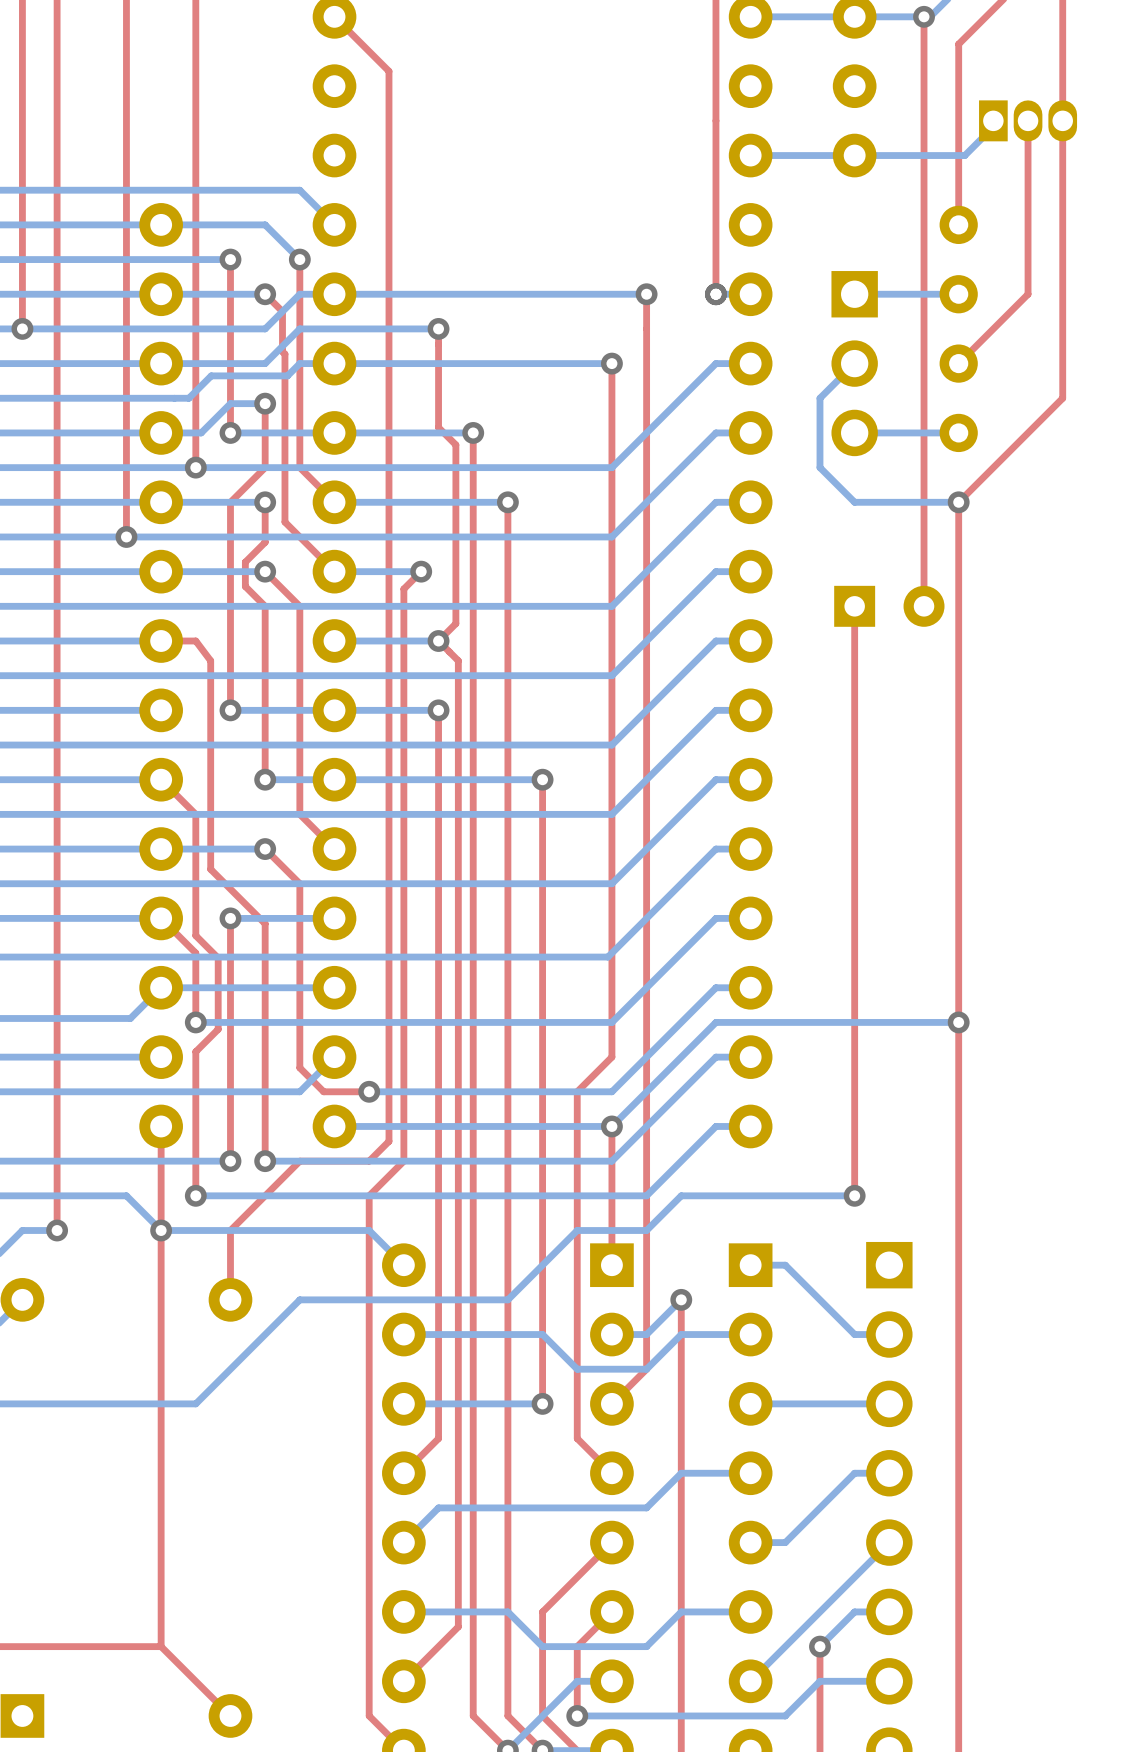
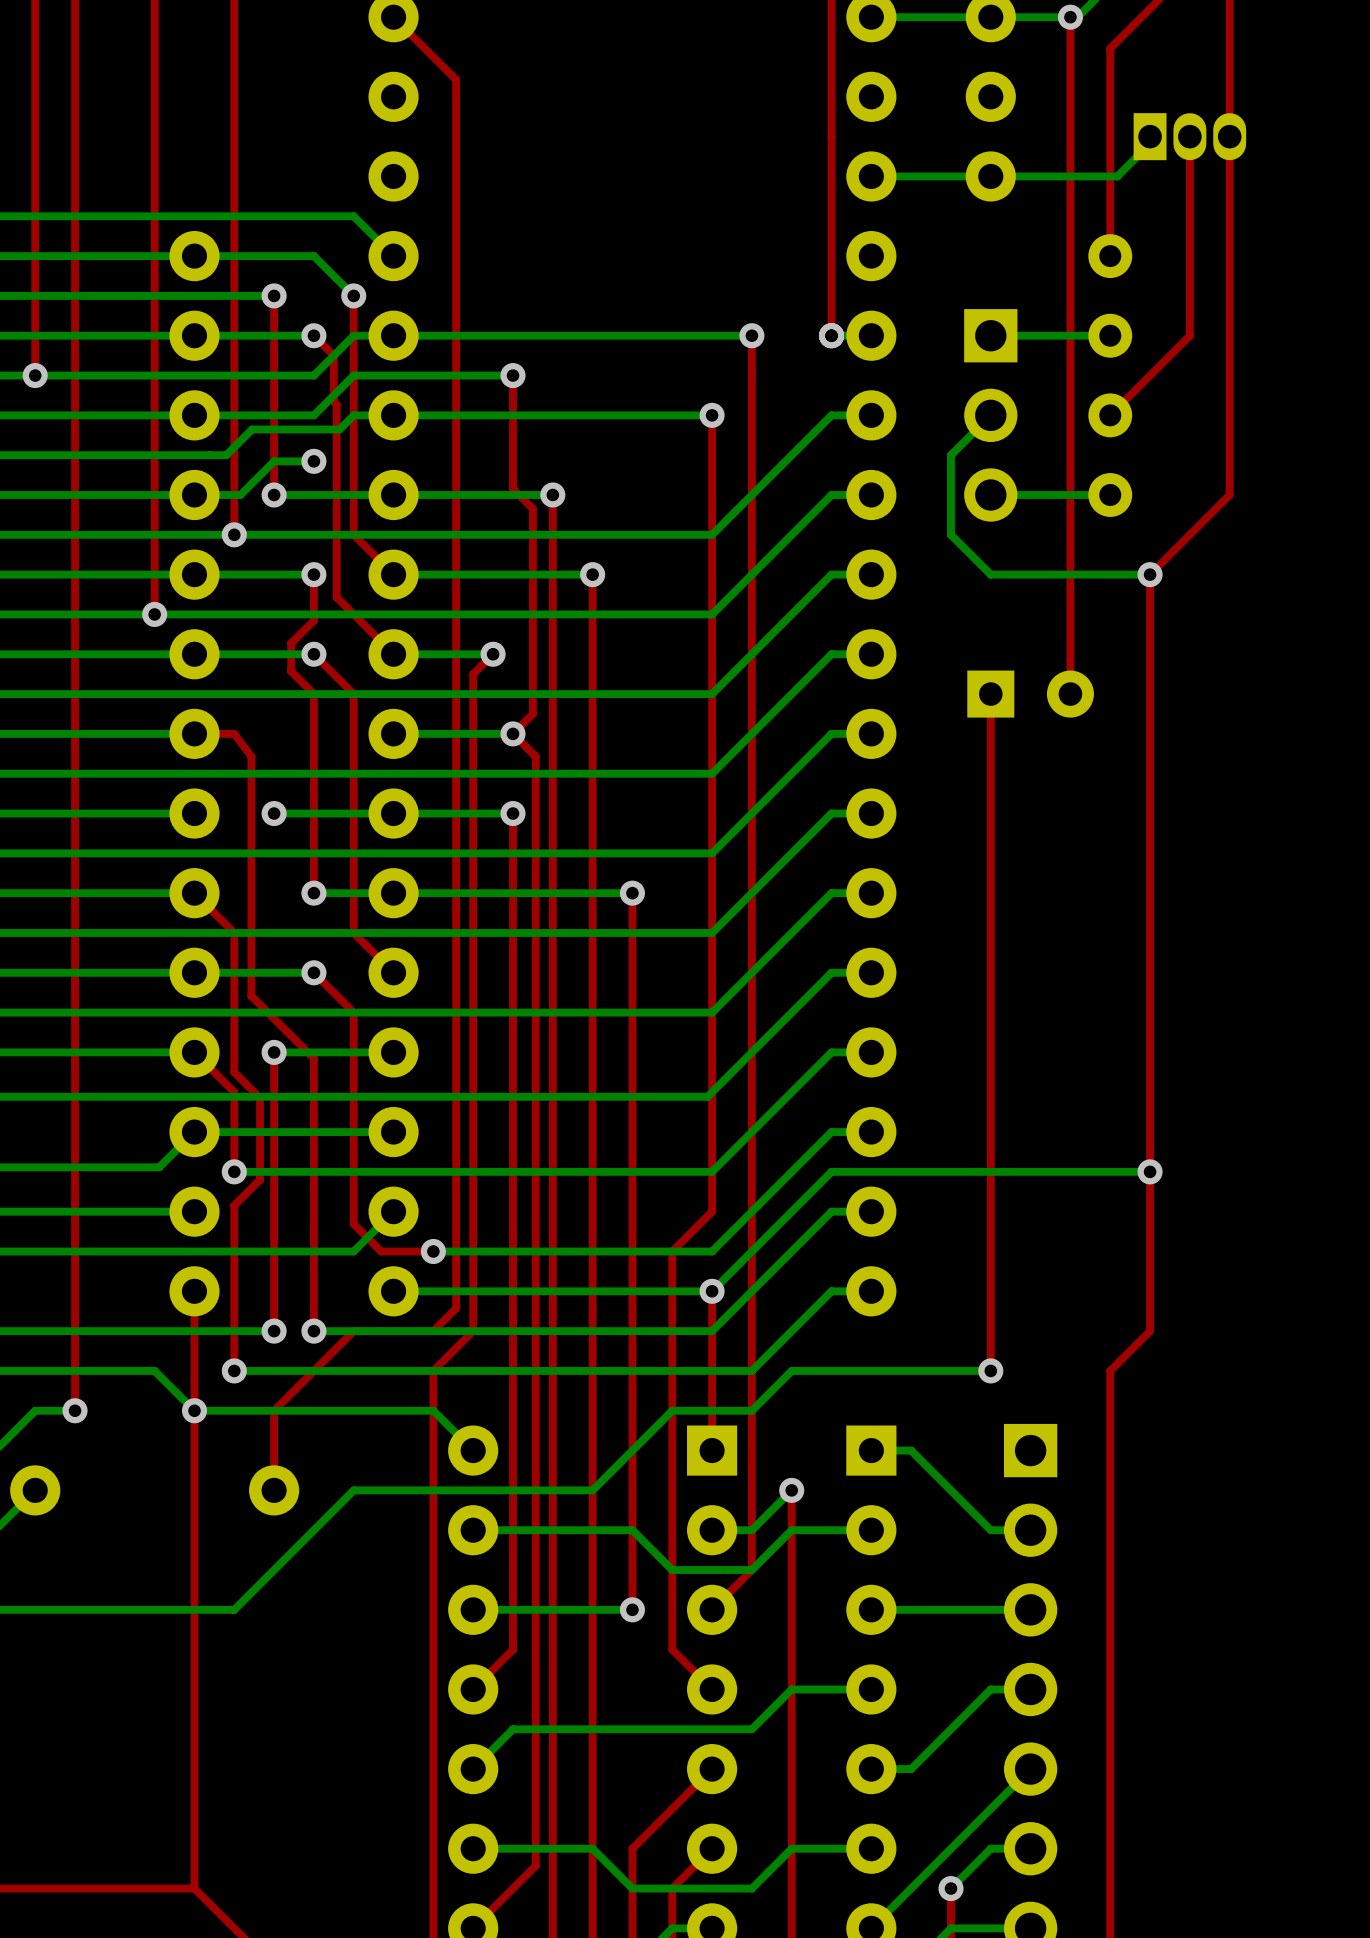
top track: (1062, 398) (958, 502) (958, 1195) -> (1229, 455) (1229, 495) (1150, 574) (1150, 1331) (1110, 1370)
top track: (265, 403) (265, 467) (230, 502) (230, 710) -> none
via position: (958, 502) -> (1150, 574)
bottom track: none -> (1150, 574) (1110, 574)
via position: (958, 1022) -> (1150, 1171)
bottom track: none -> (1150, 1171) (1110, 1171)

